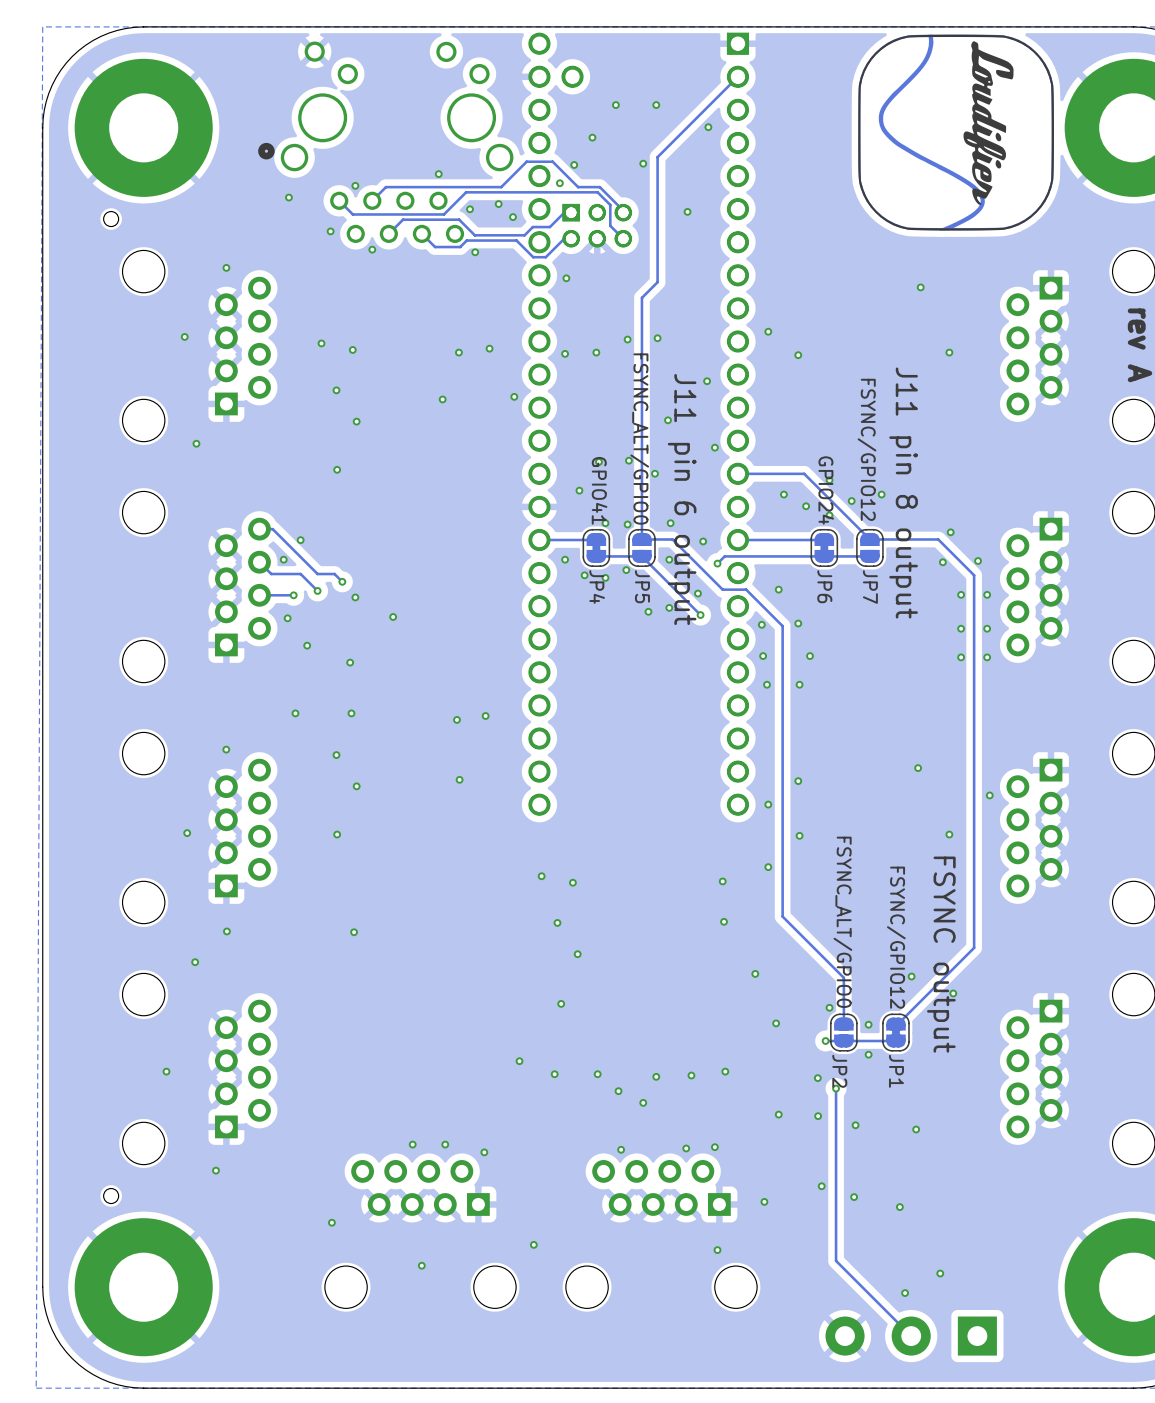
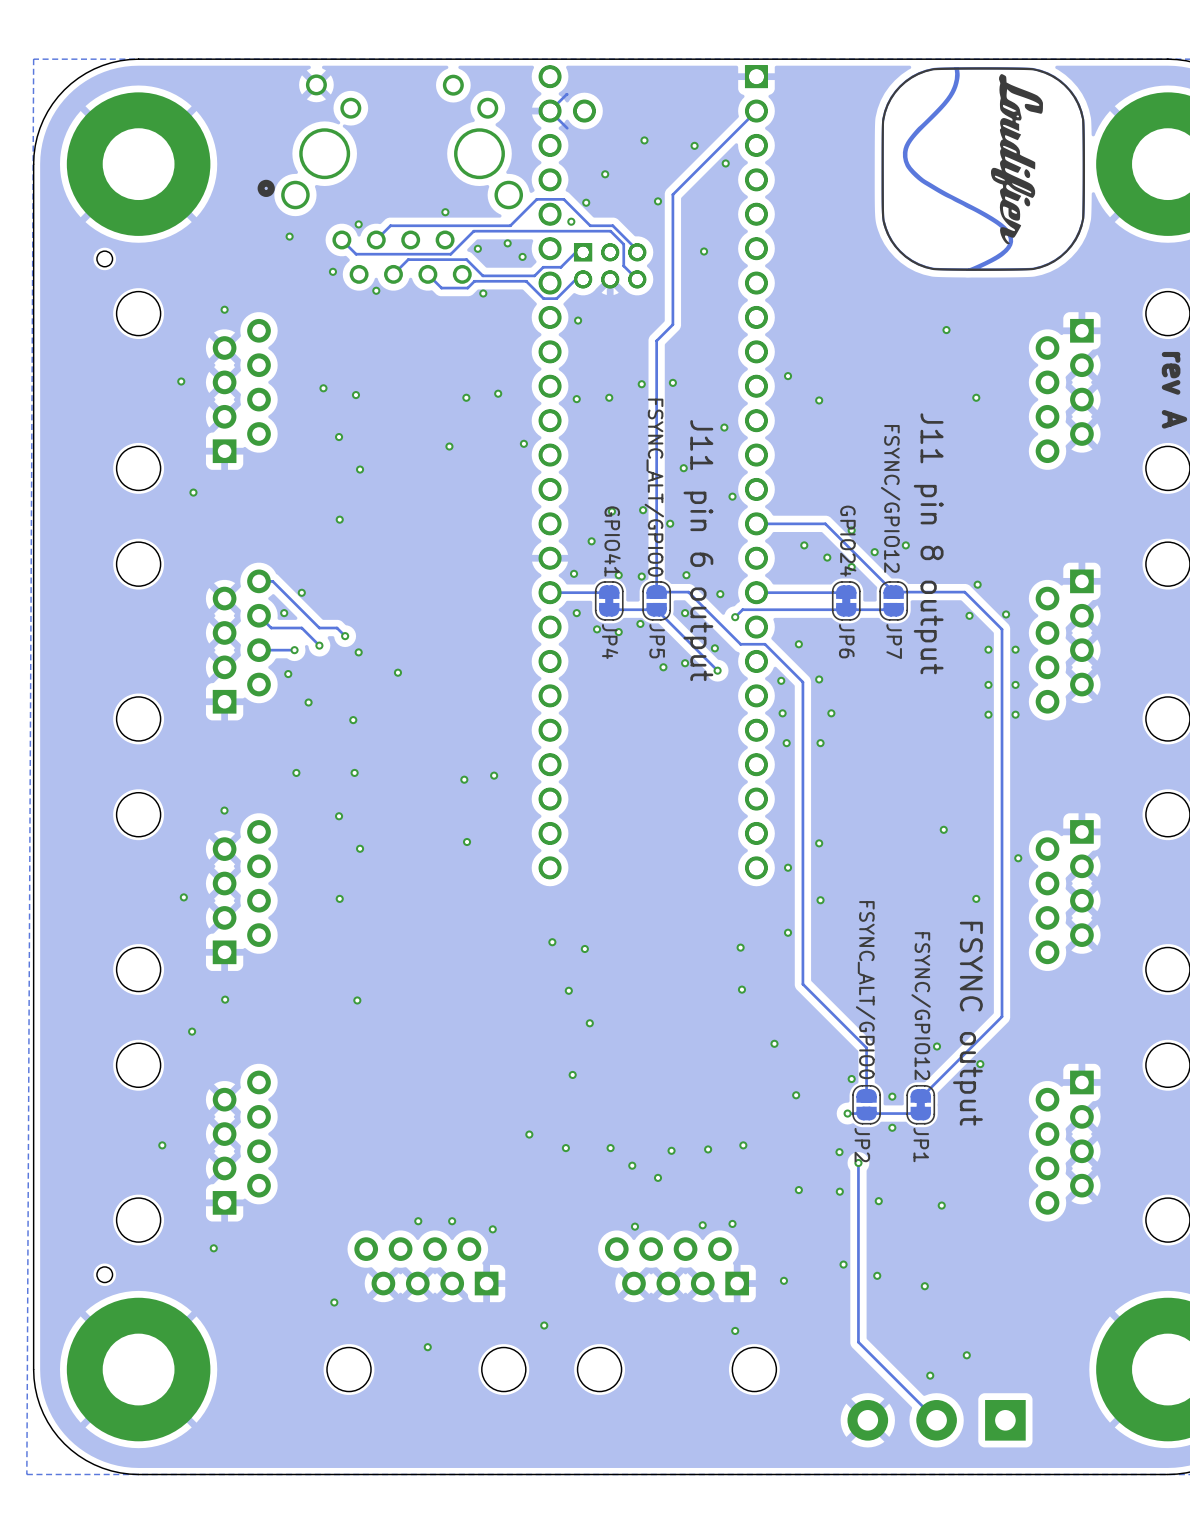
track: none -> (567, 94) (550, 111) (567, 128)
via: (615, 105) -> none
via: none -> (644, 140)
via: (656, 105) -> none
via: none -> (694, 145)
via: none -> (574, 573)

